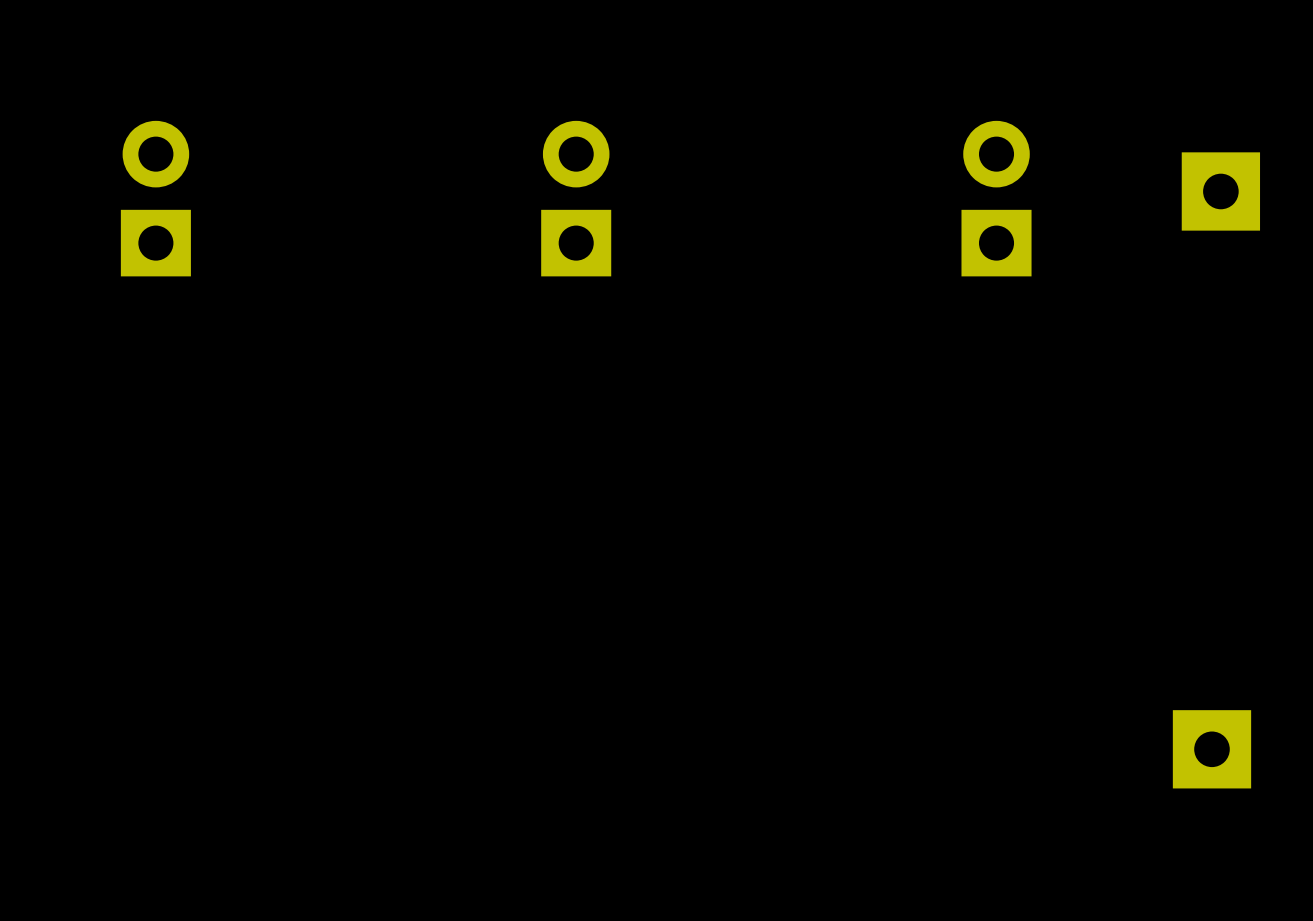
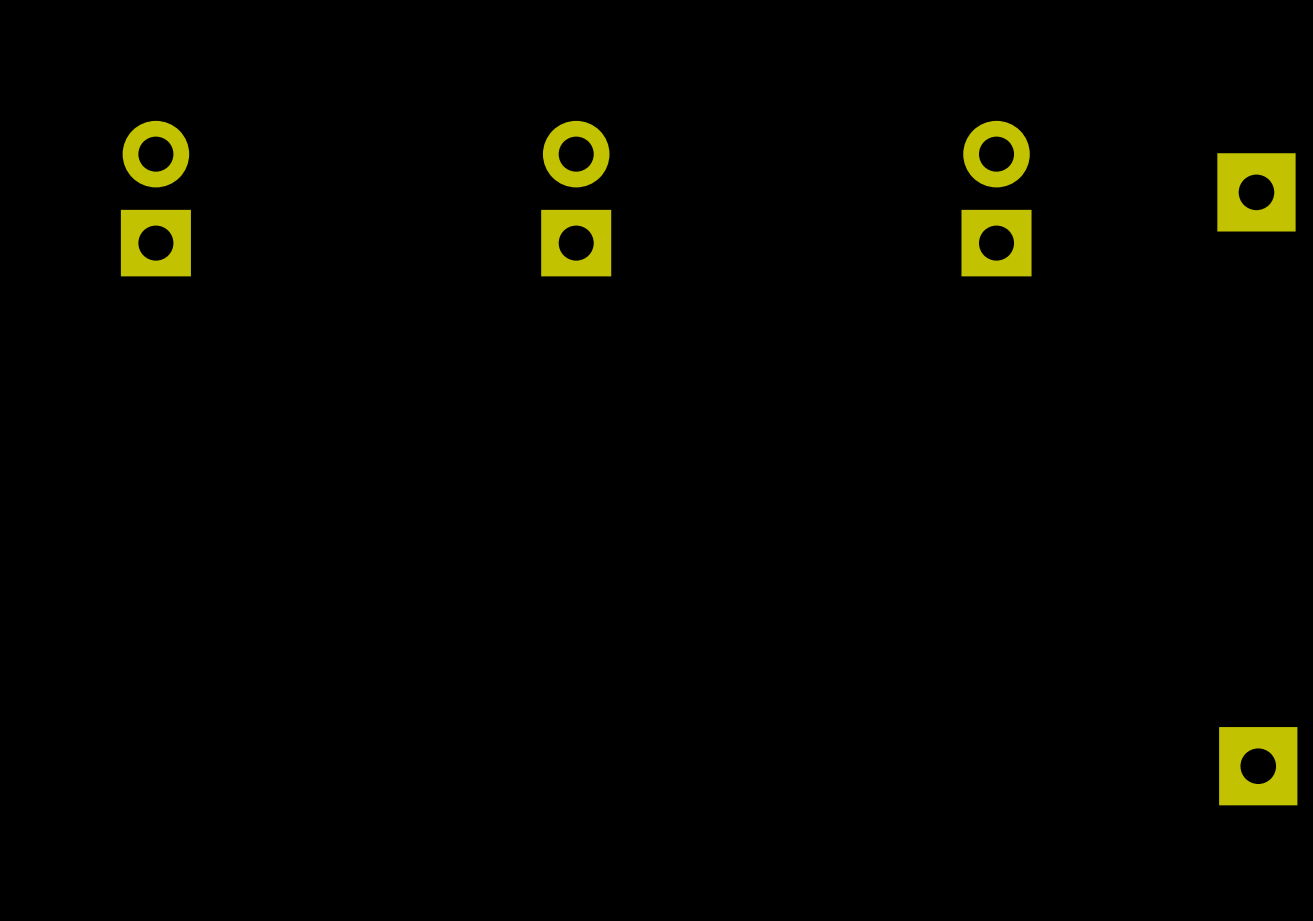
part position: (1220, 191) -> (1256, 192)
part position: (1211, 749) -> (1258, 766)

